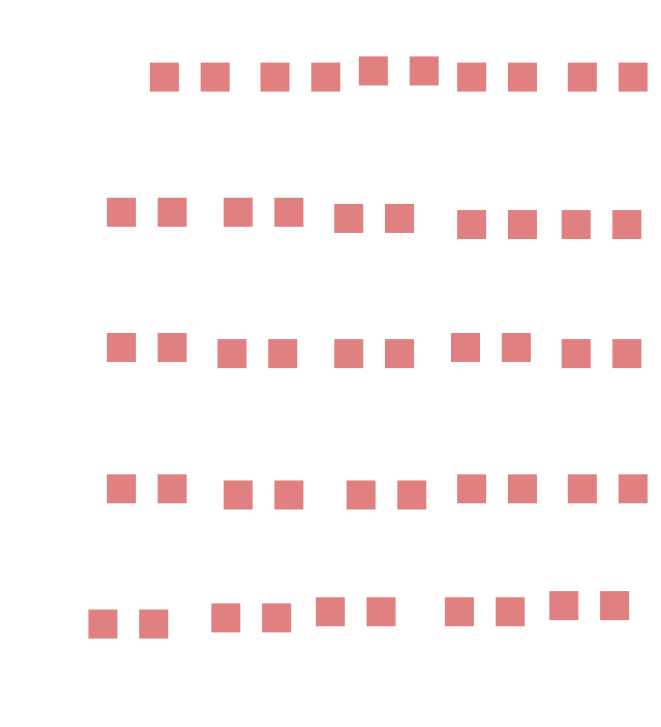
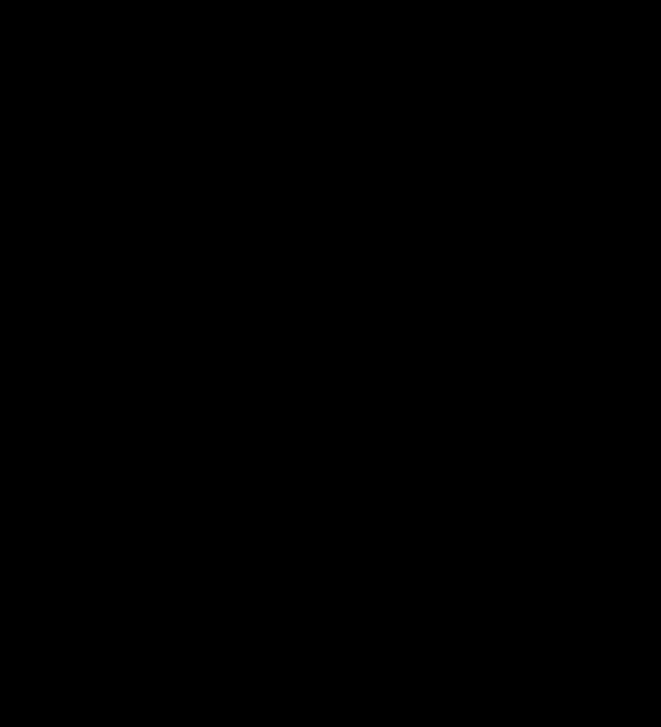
part: (398, 70) -> none
part: (189, 77) -> none
part: (300, 77) -> none
part: (497, 77) -> none
part: (607, 77) -> none
part: (146, 212) -> none
part: (263, 212) -> none
part: (374, 218) -> none
part: (497, 224) -> none
part: (601, 224) -> none
part: (146, 347) -> none
part: (490, 347) -> none
part: (257, 353) -> none
part: (374, 353) -> none
part: (601, 353) -> none
part: (146, 488) -> none
part: (497, 488) -> none
part: (607, 488) -> none
part: (263, 494) -> none
part: (386, 494) -> none
part: (589, 605) -> none
part: (355, 611) -> none
part: (484, 611) -> none
part: (251, 617) -> none
part: (128, 624) -> none

